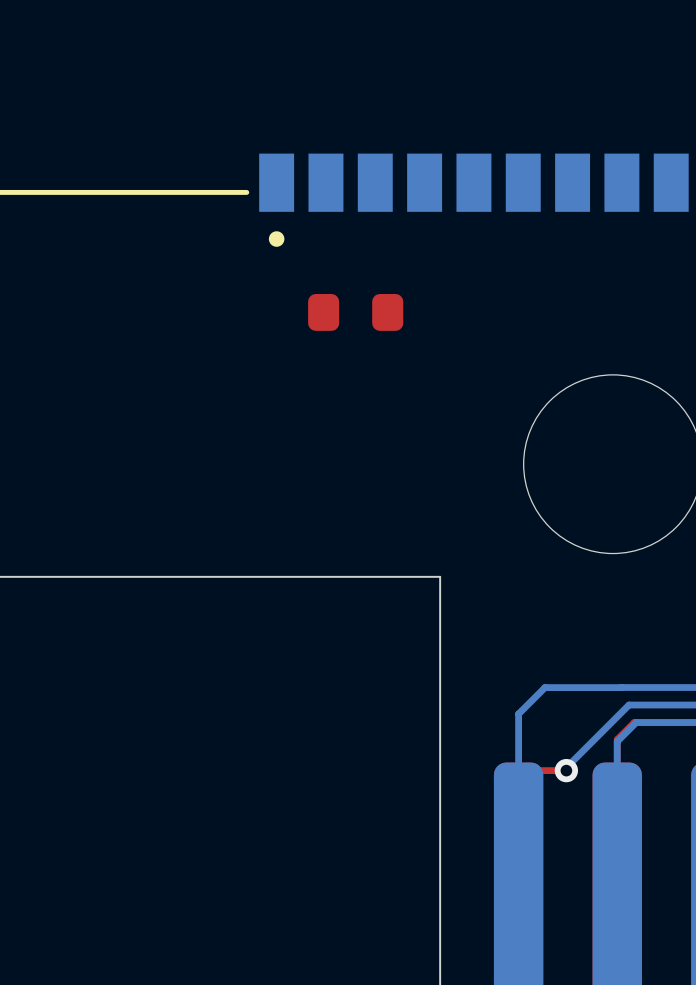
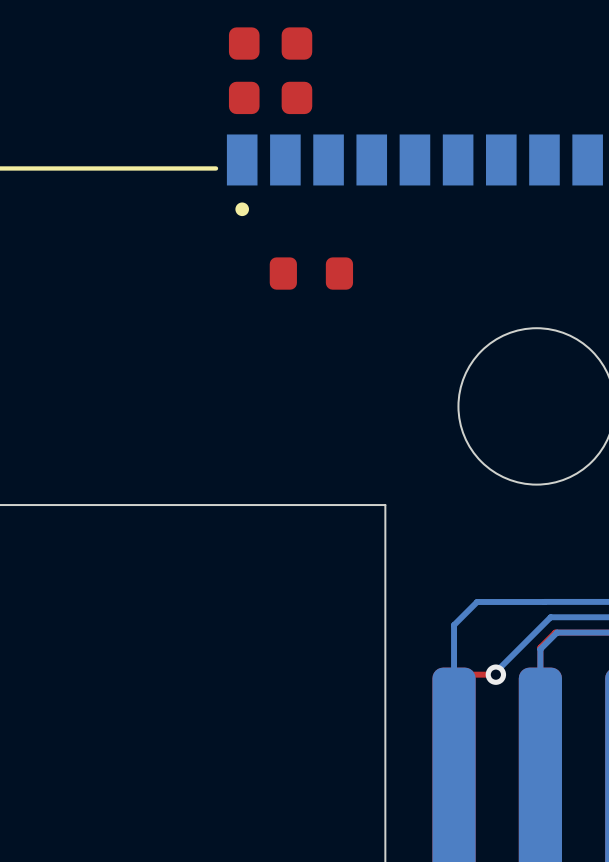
part: none -> (270, 43)
part: none -> (270, 97)

